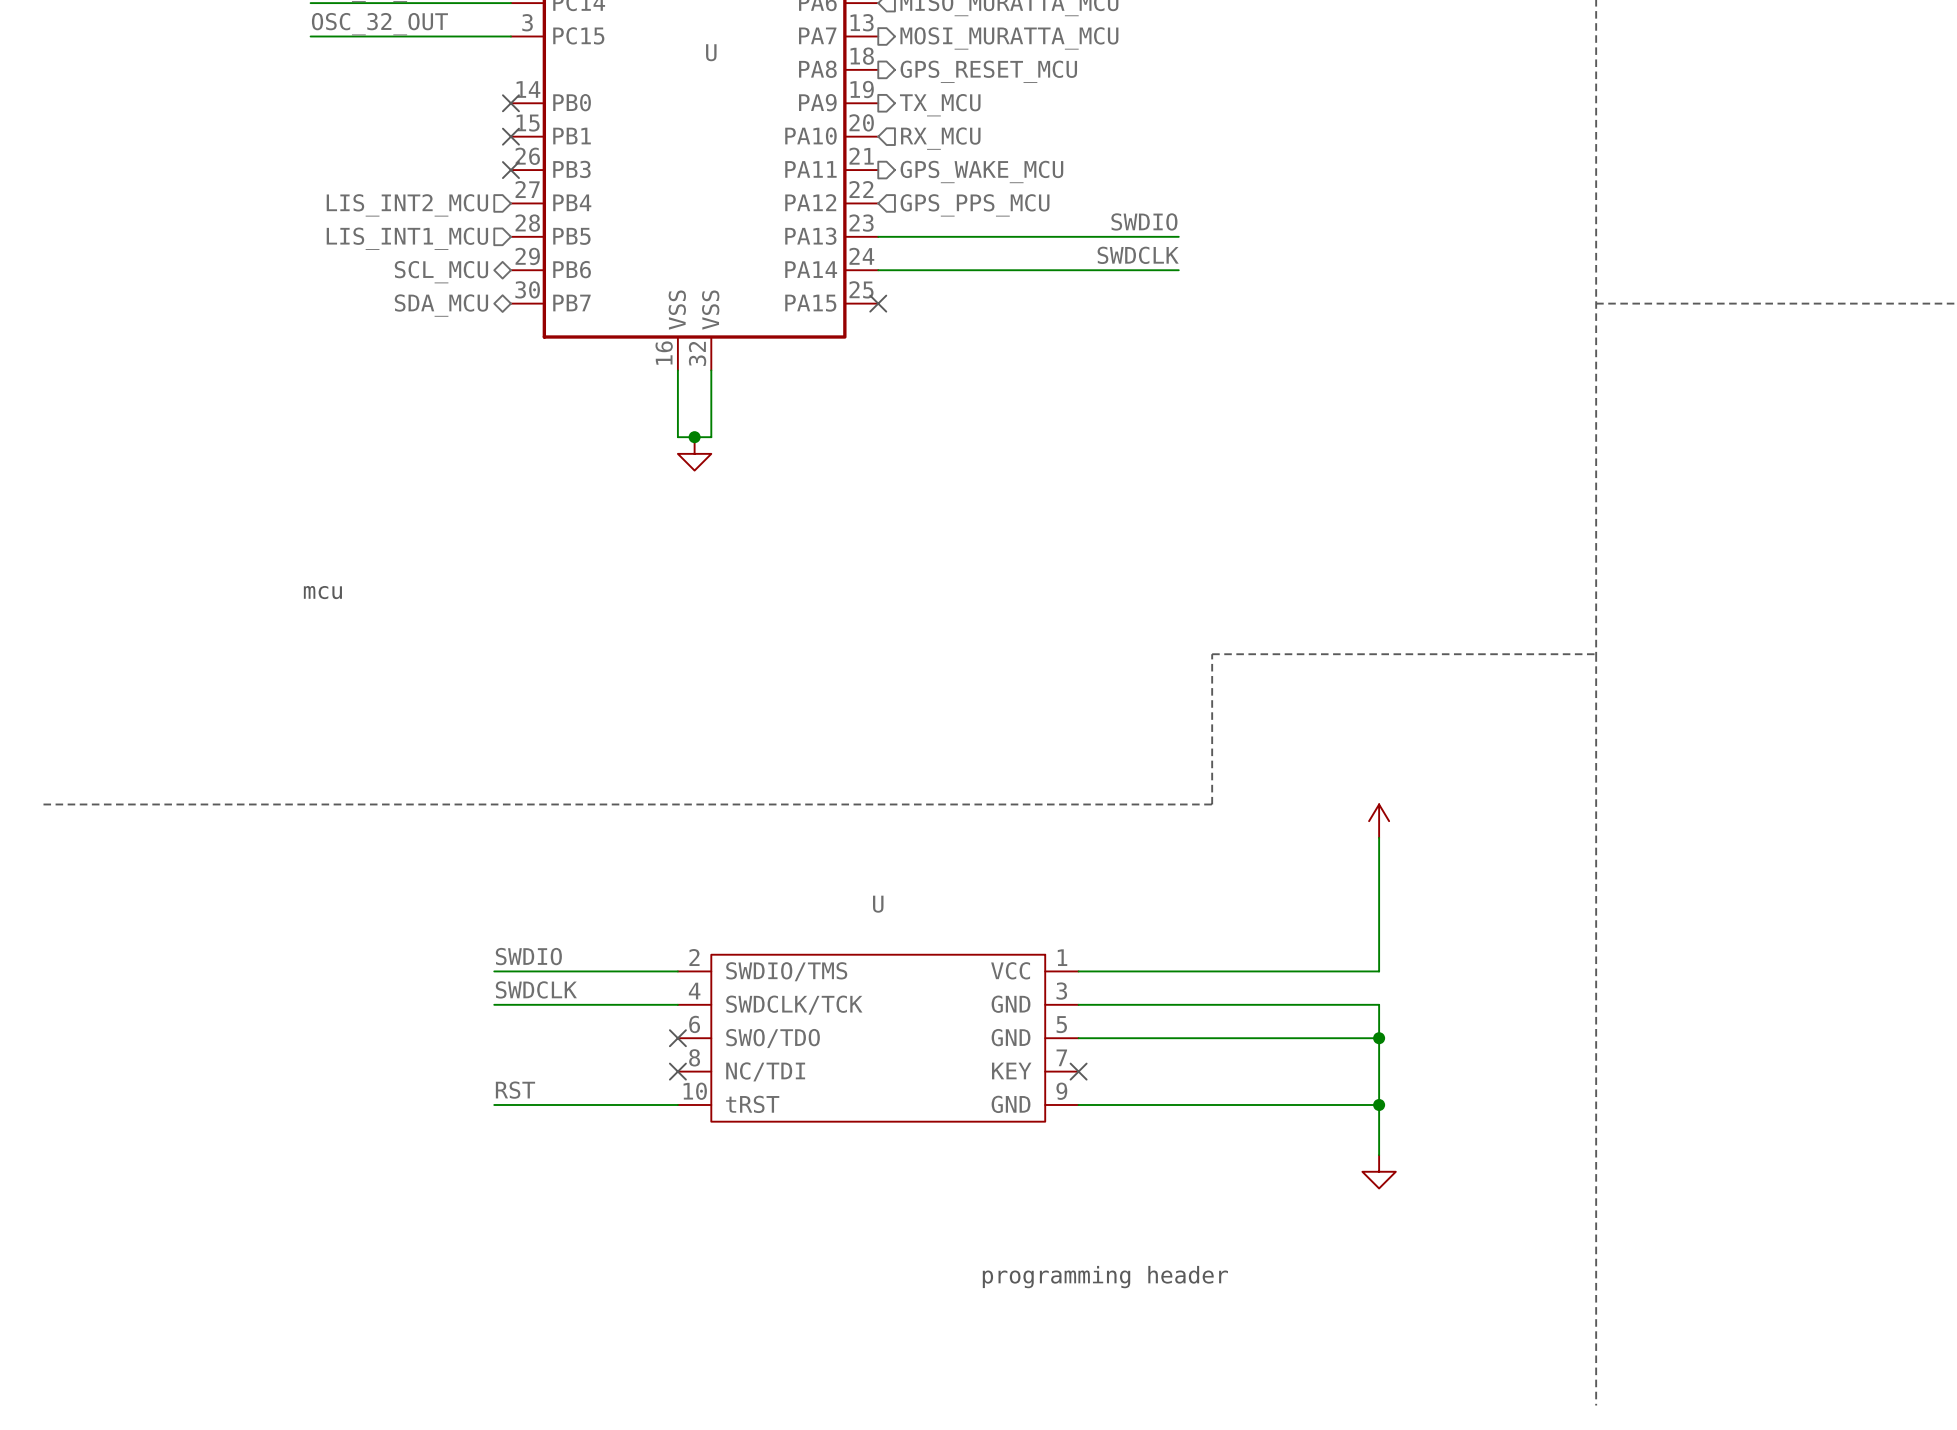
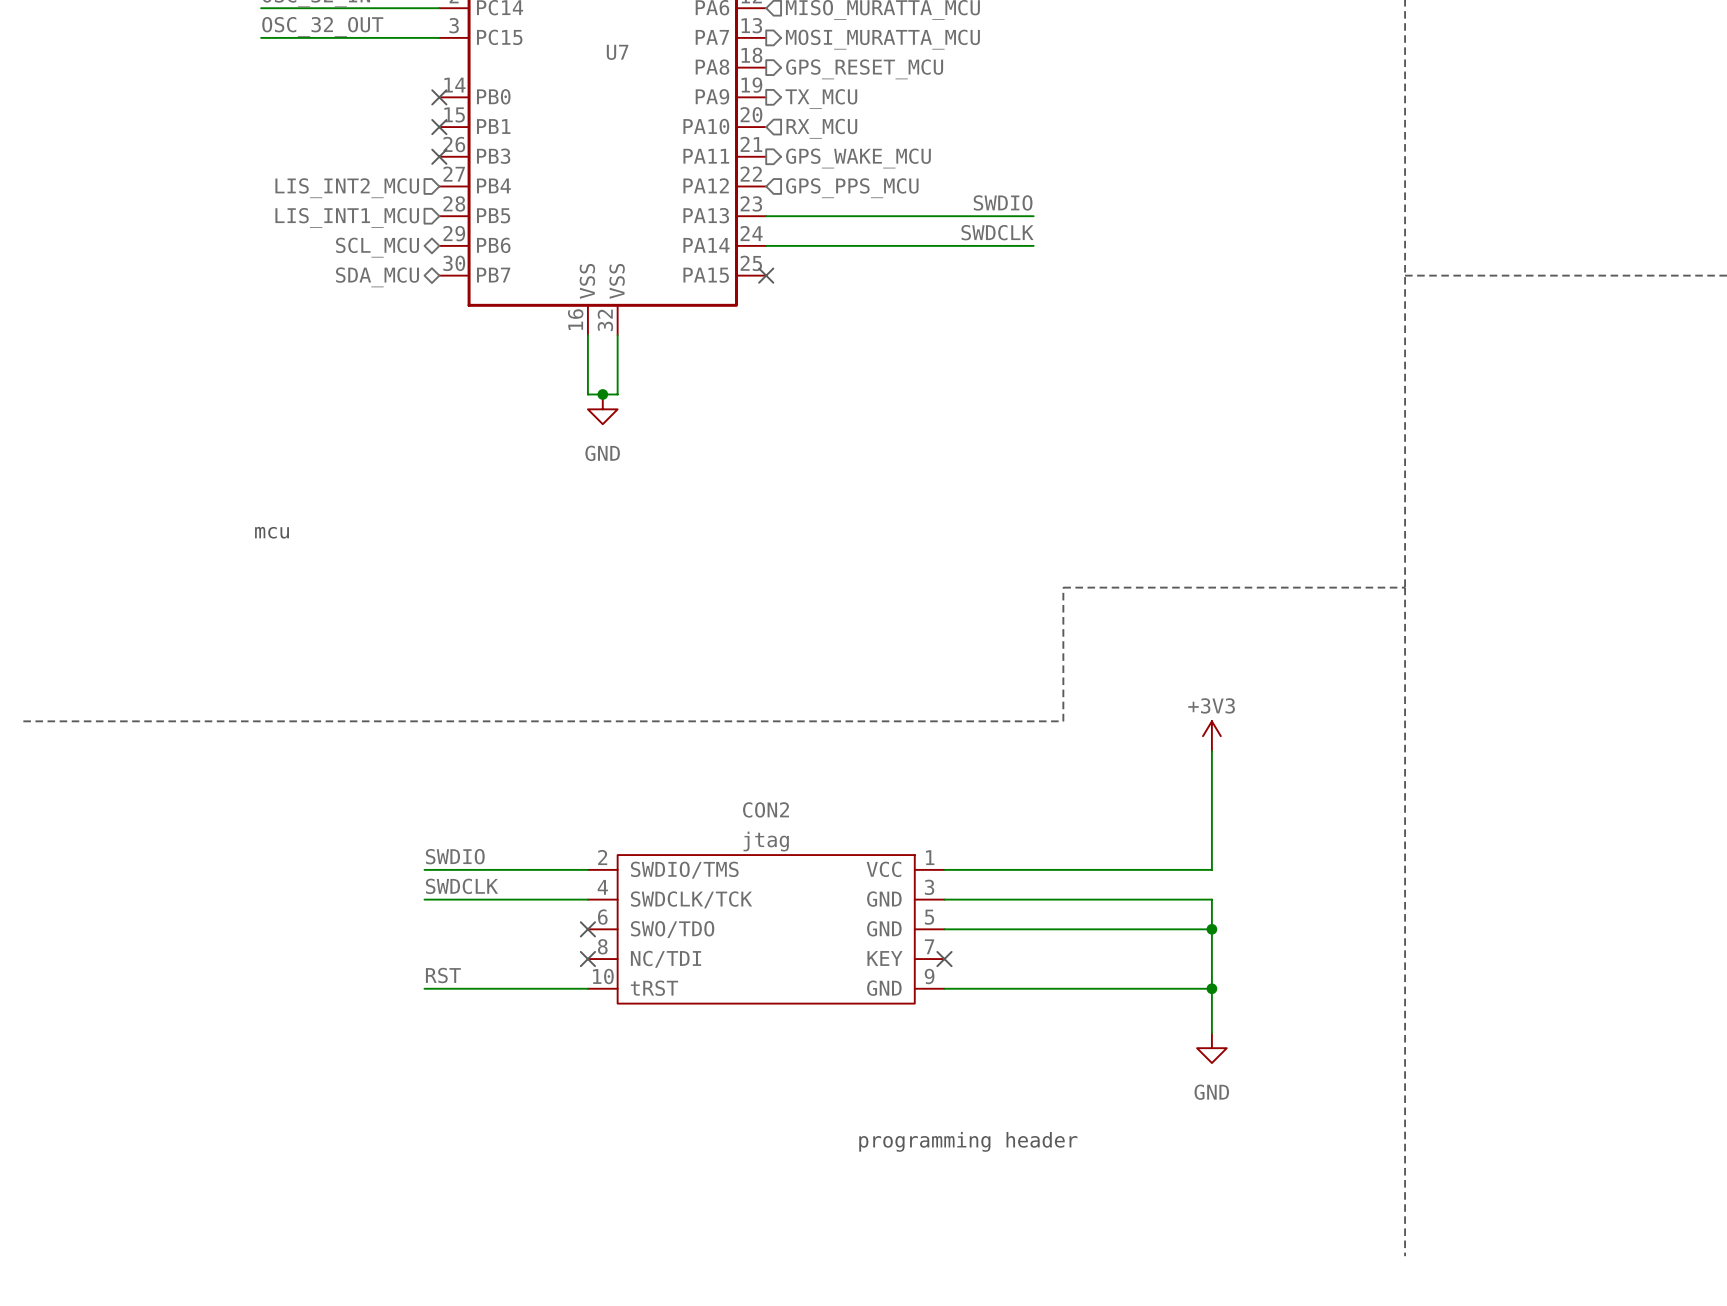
U name: U (711, 52) -> U7 (617, 52)
power symbol text: none -> GND (602, 453)
power symbol text: none -> +3V3 (1211, 705)
U name: U (878, 904) -> CON2 (766, 809)
U value: none -> jtag (766, 841)
power symbol text: none -> GND (1211, 1092)

